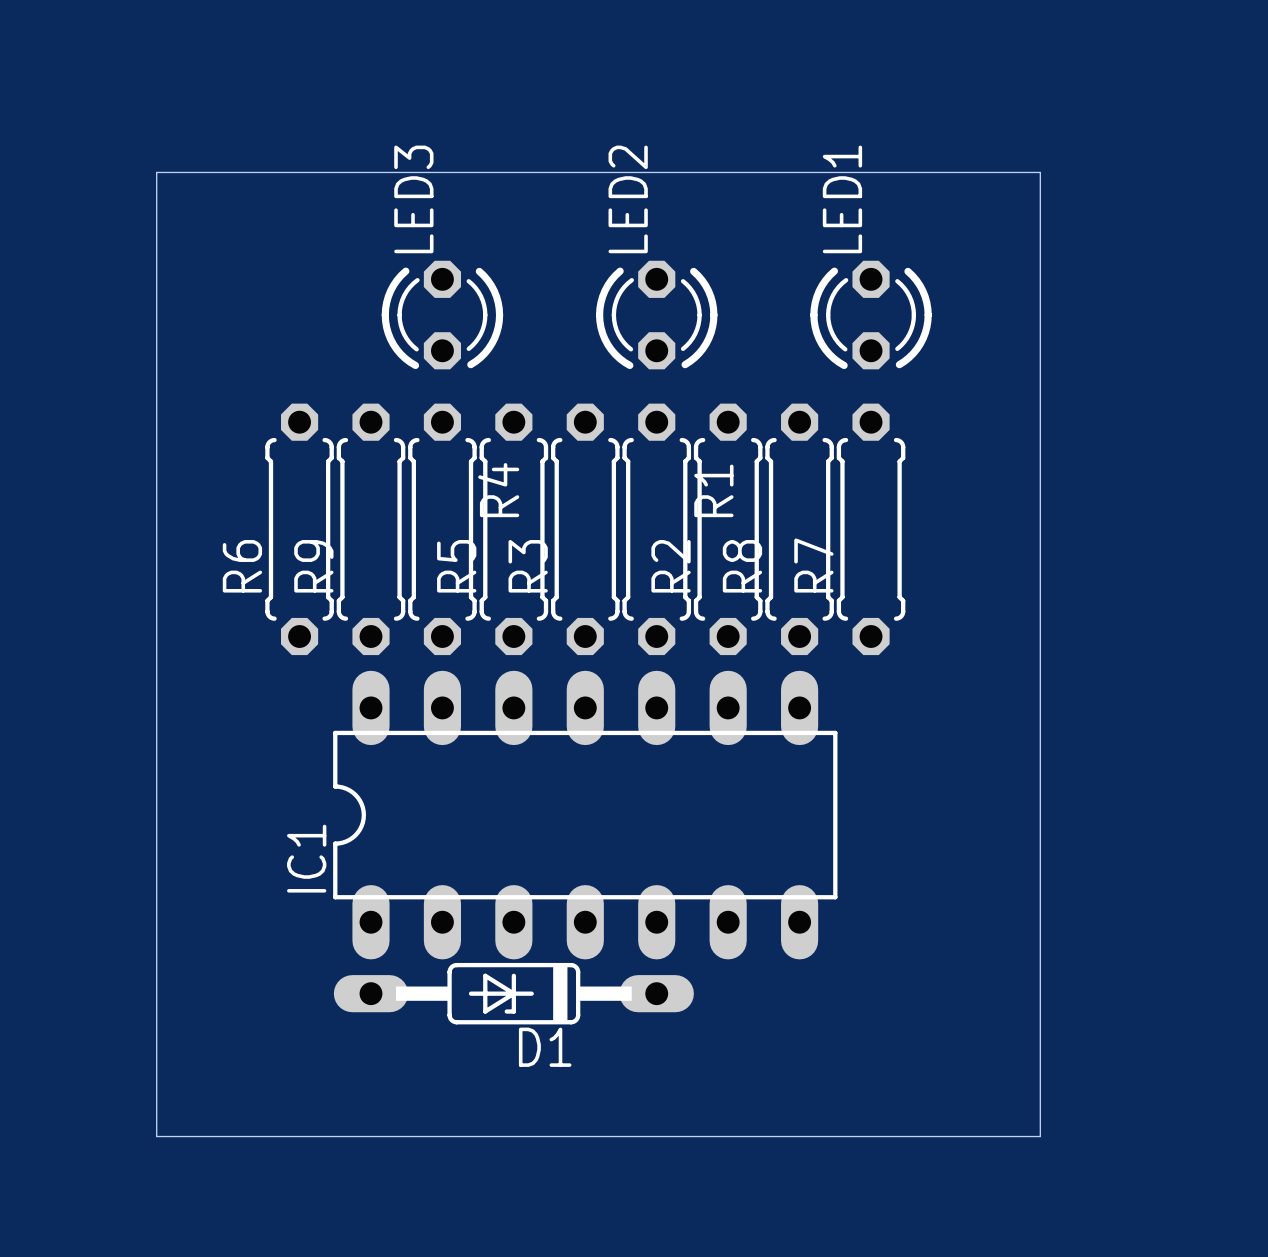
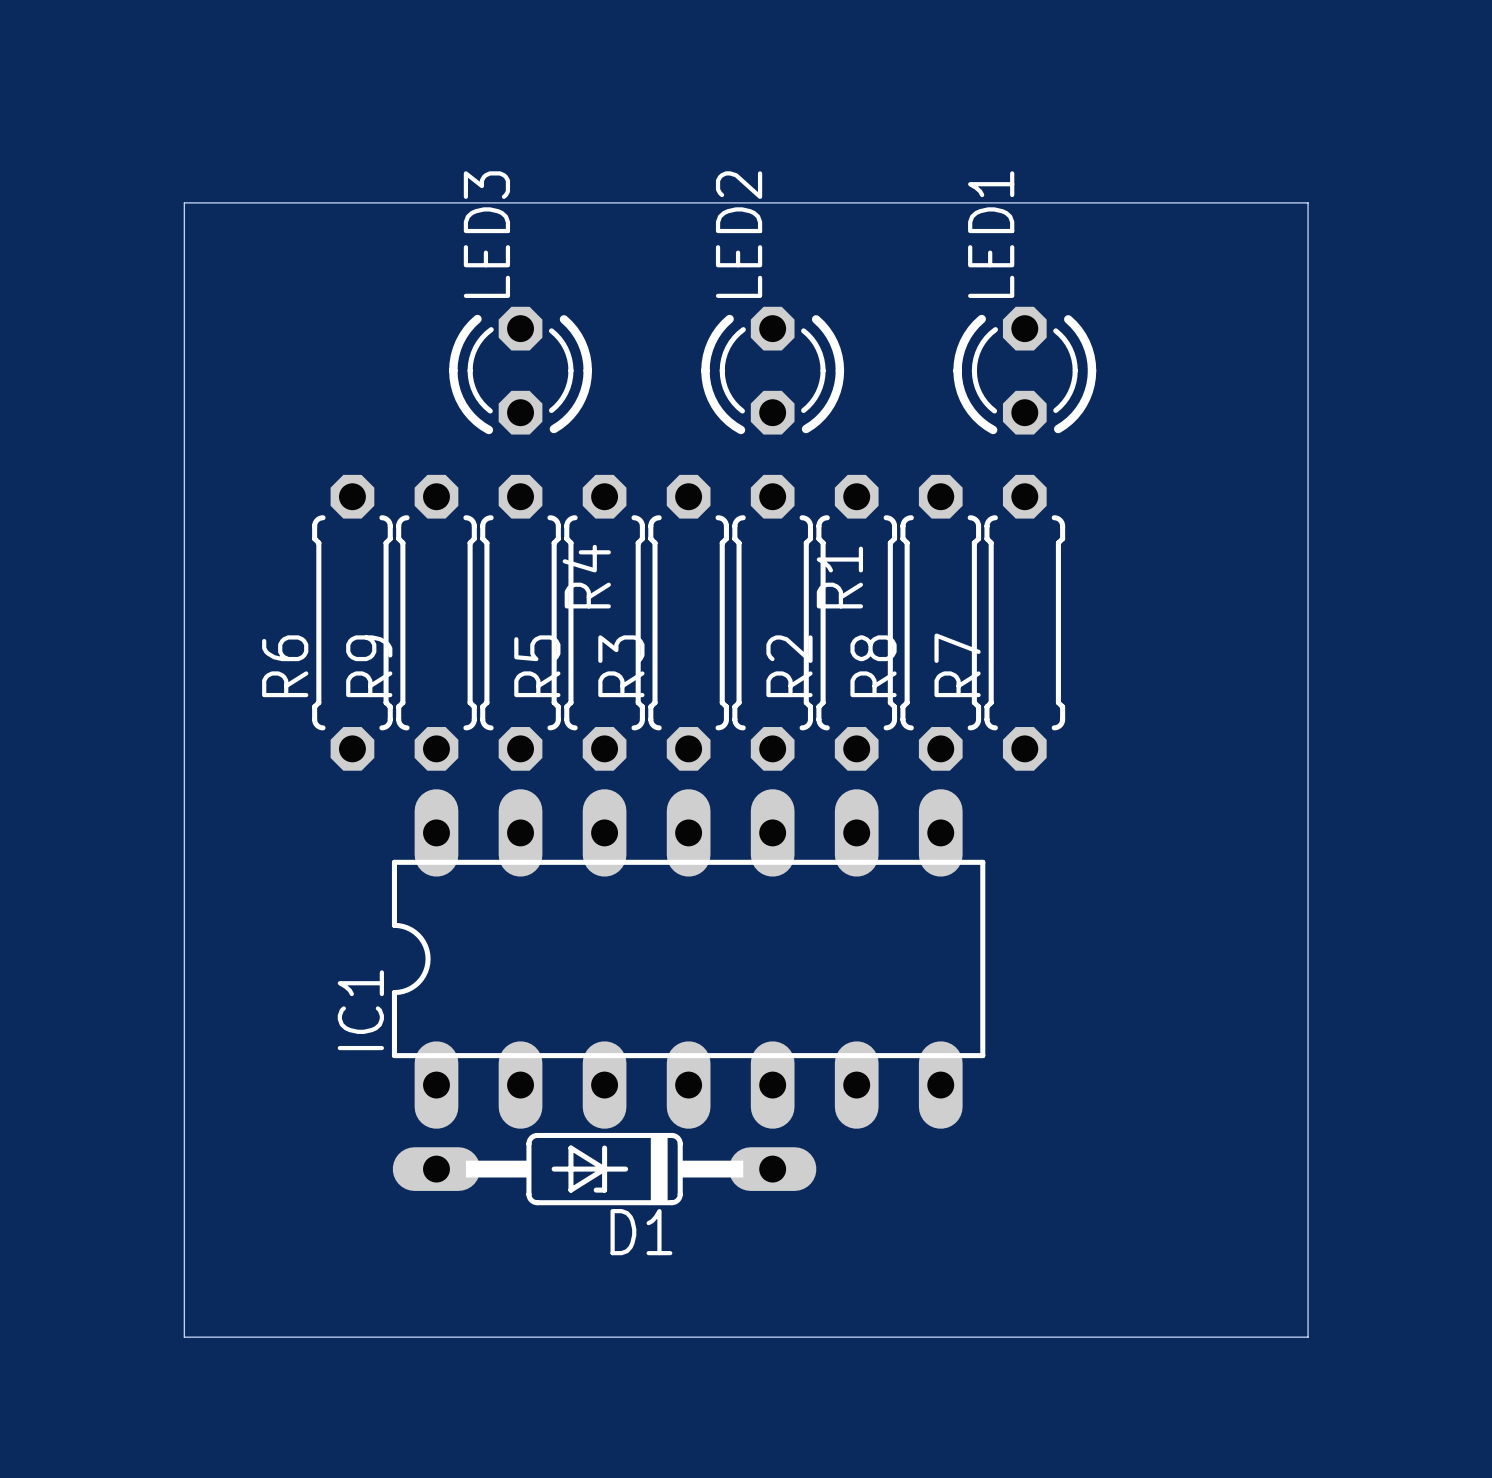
board edge: (1040, 172) (1040, 1136) -> (1223, 202) (1308, 202) (1308, 1337) (1223, 1337)

